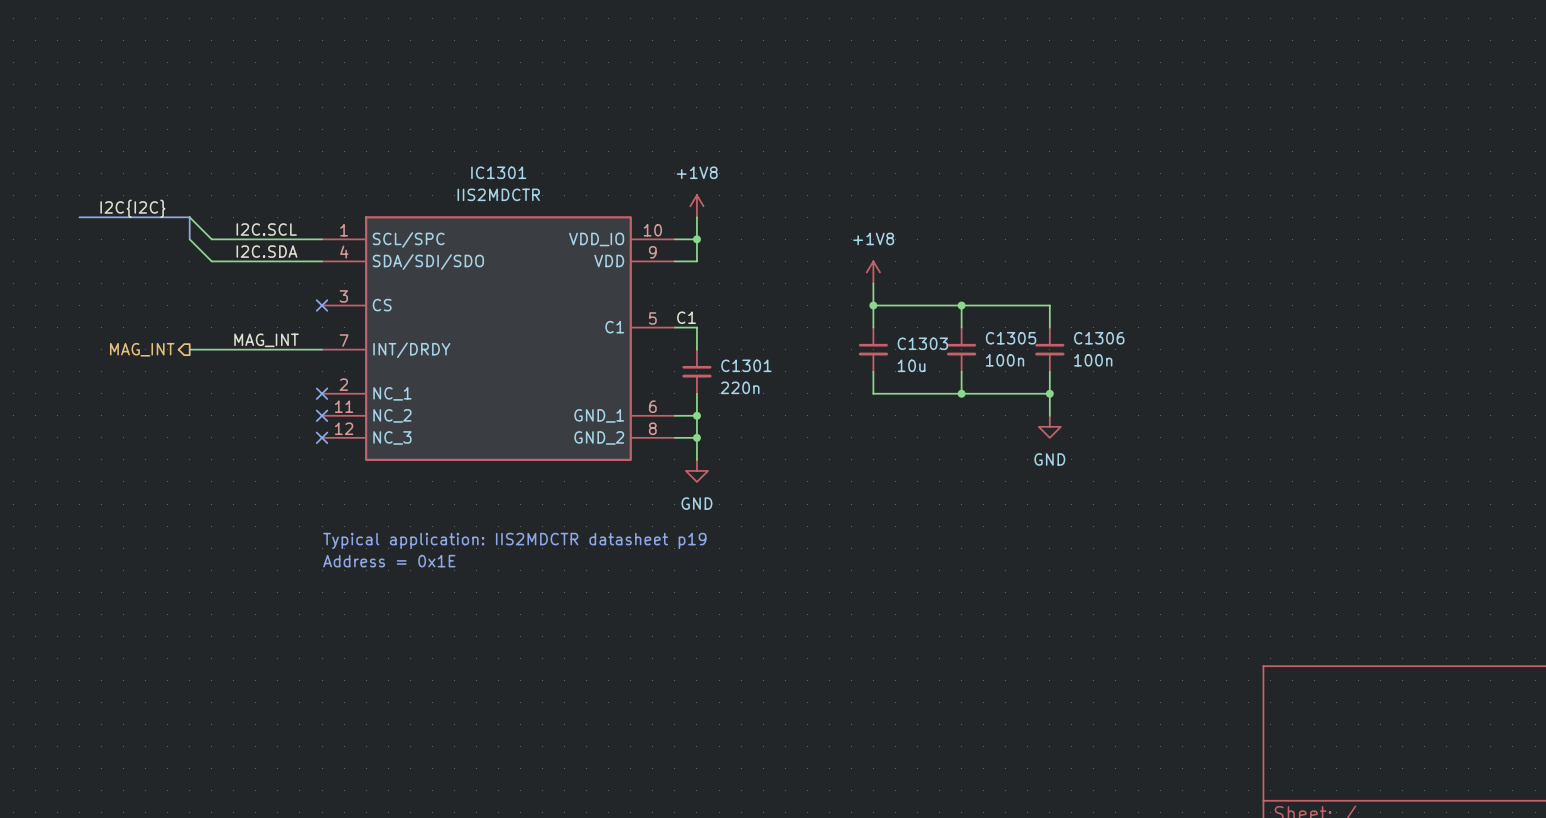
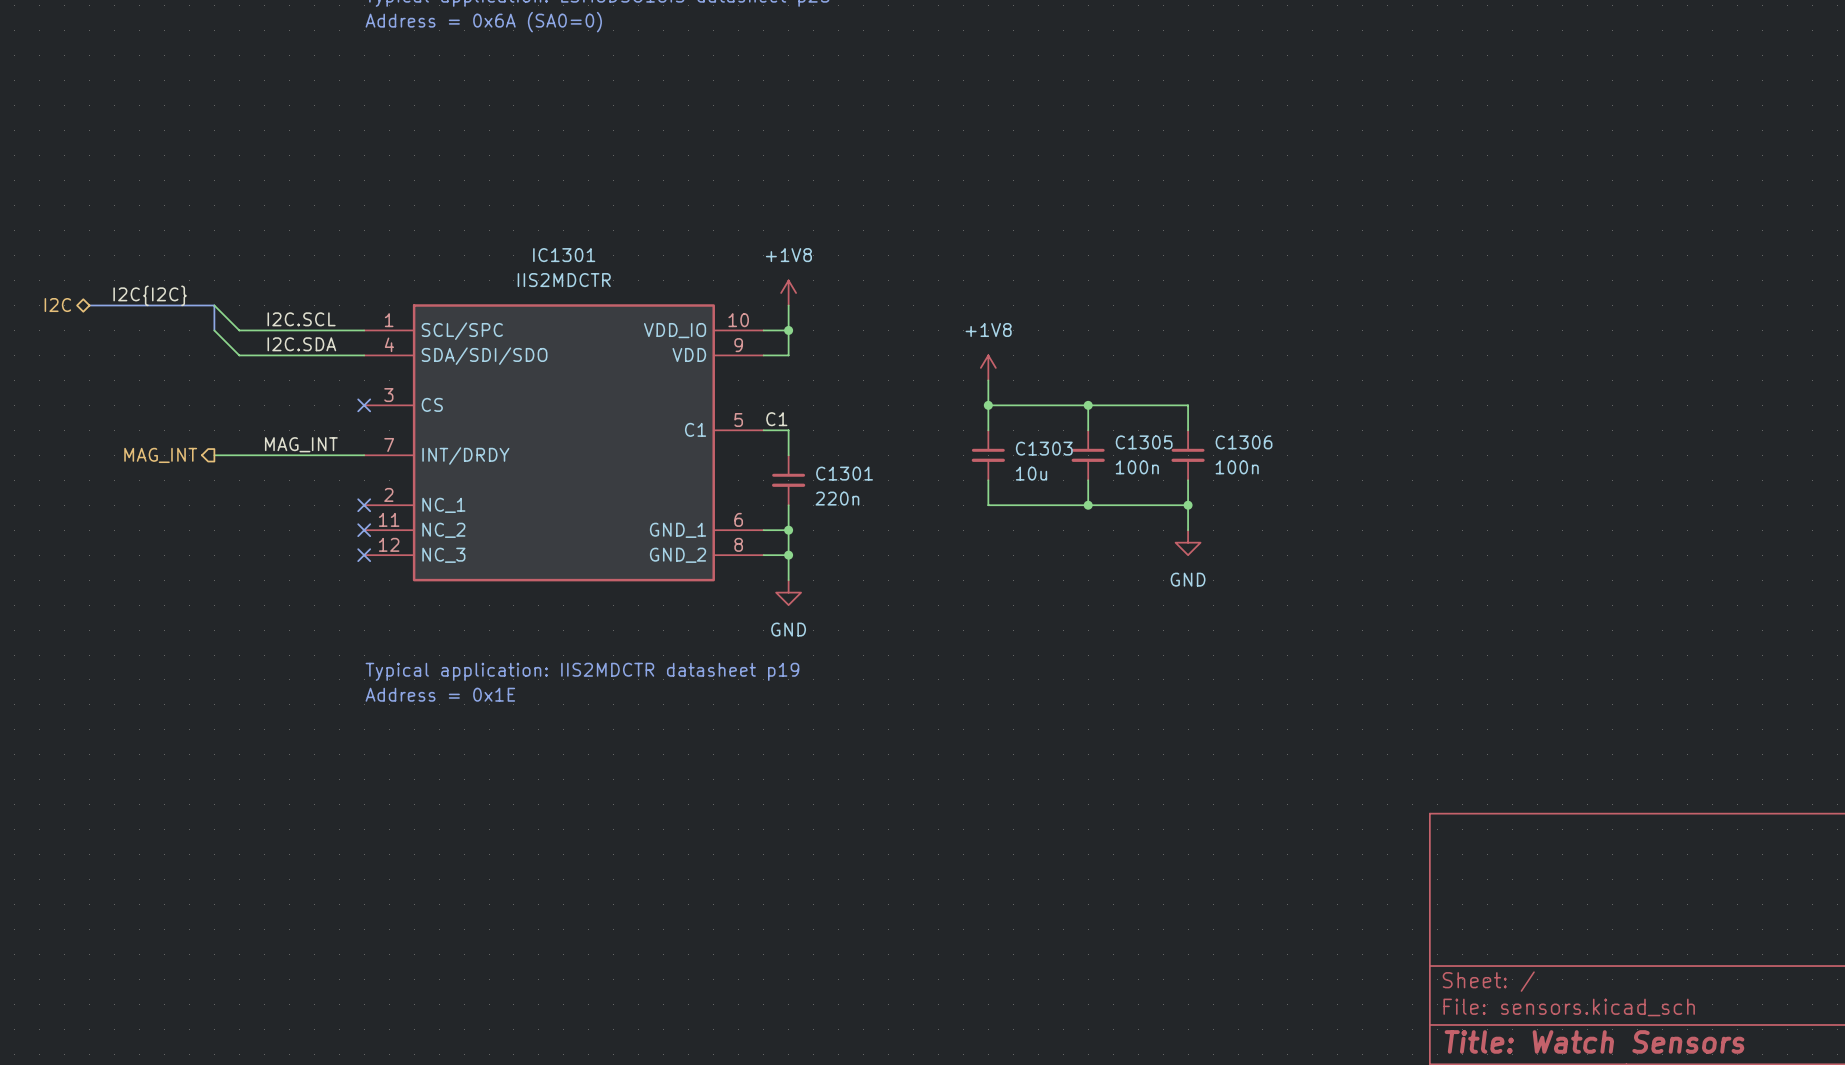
hierarchical label: none -> I2C (57, 305)

